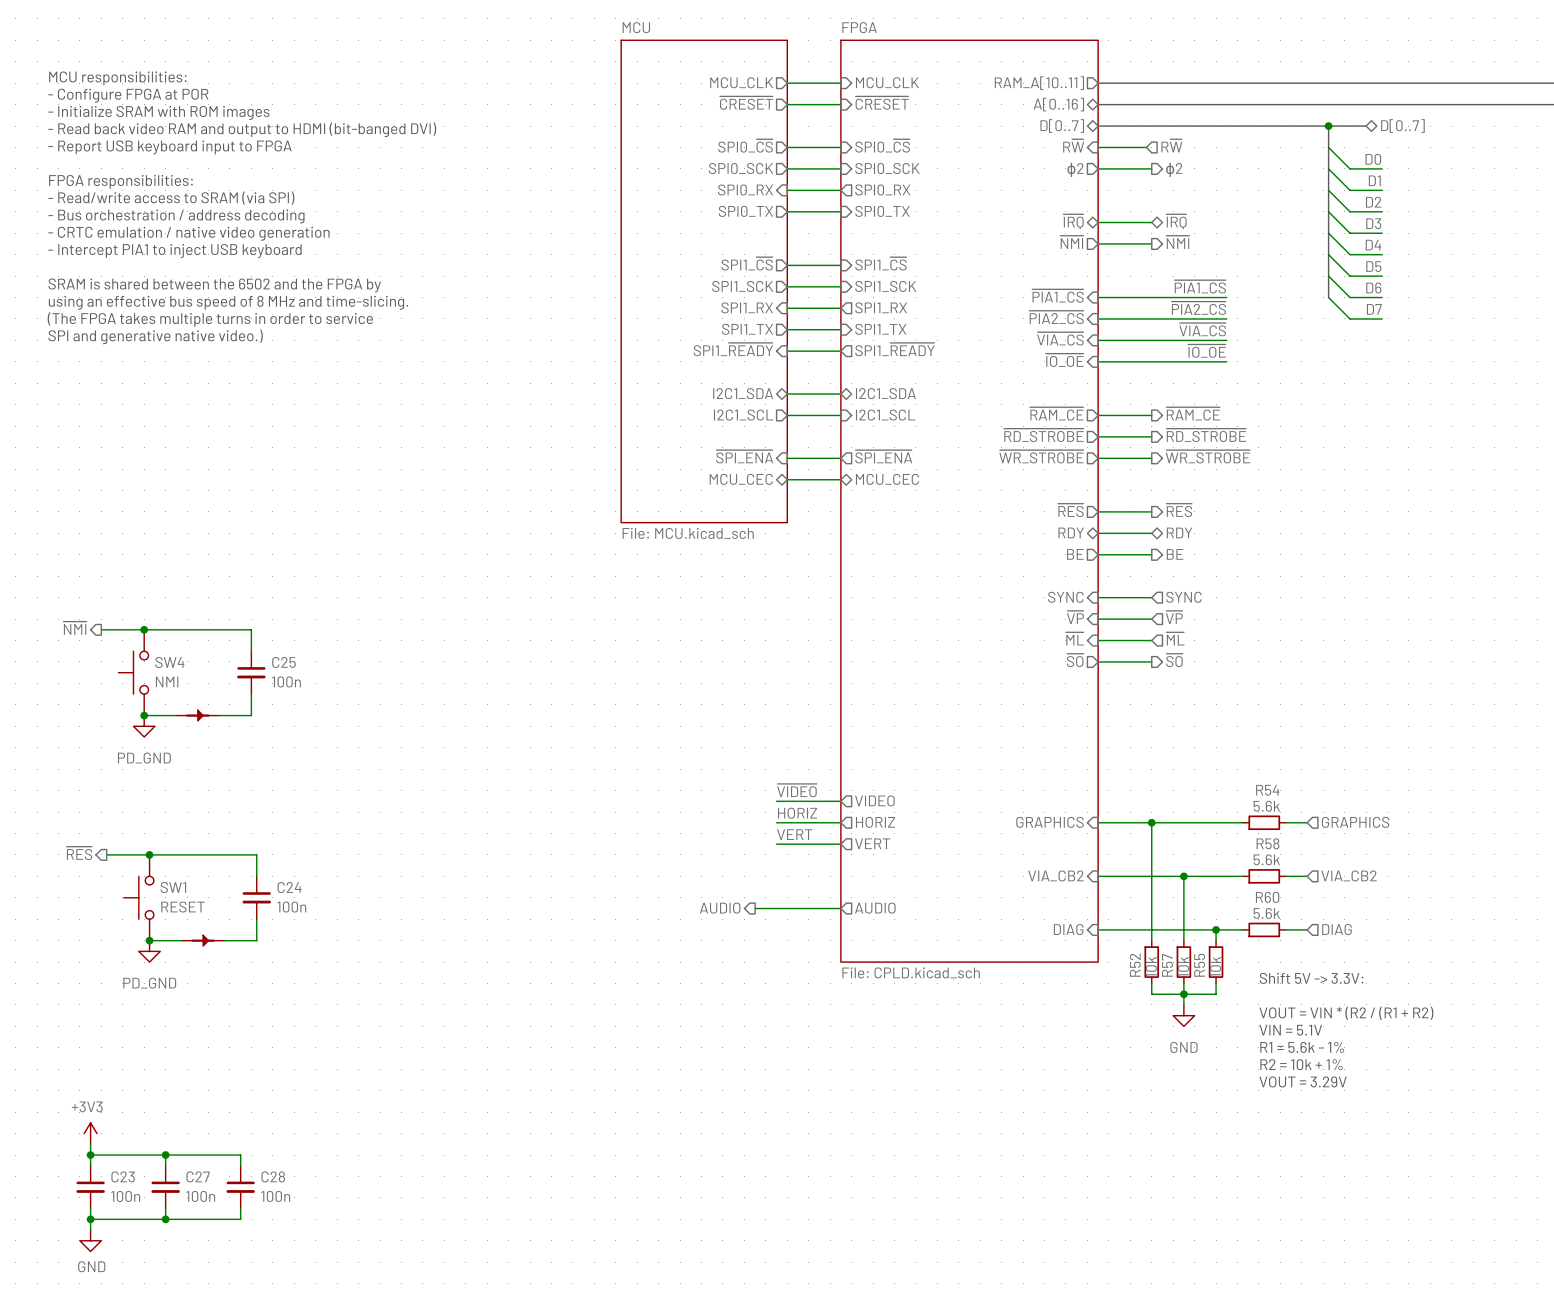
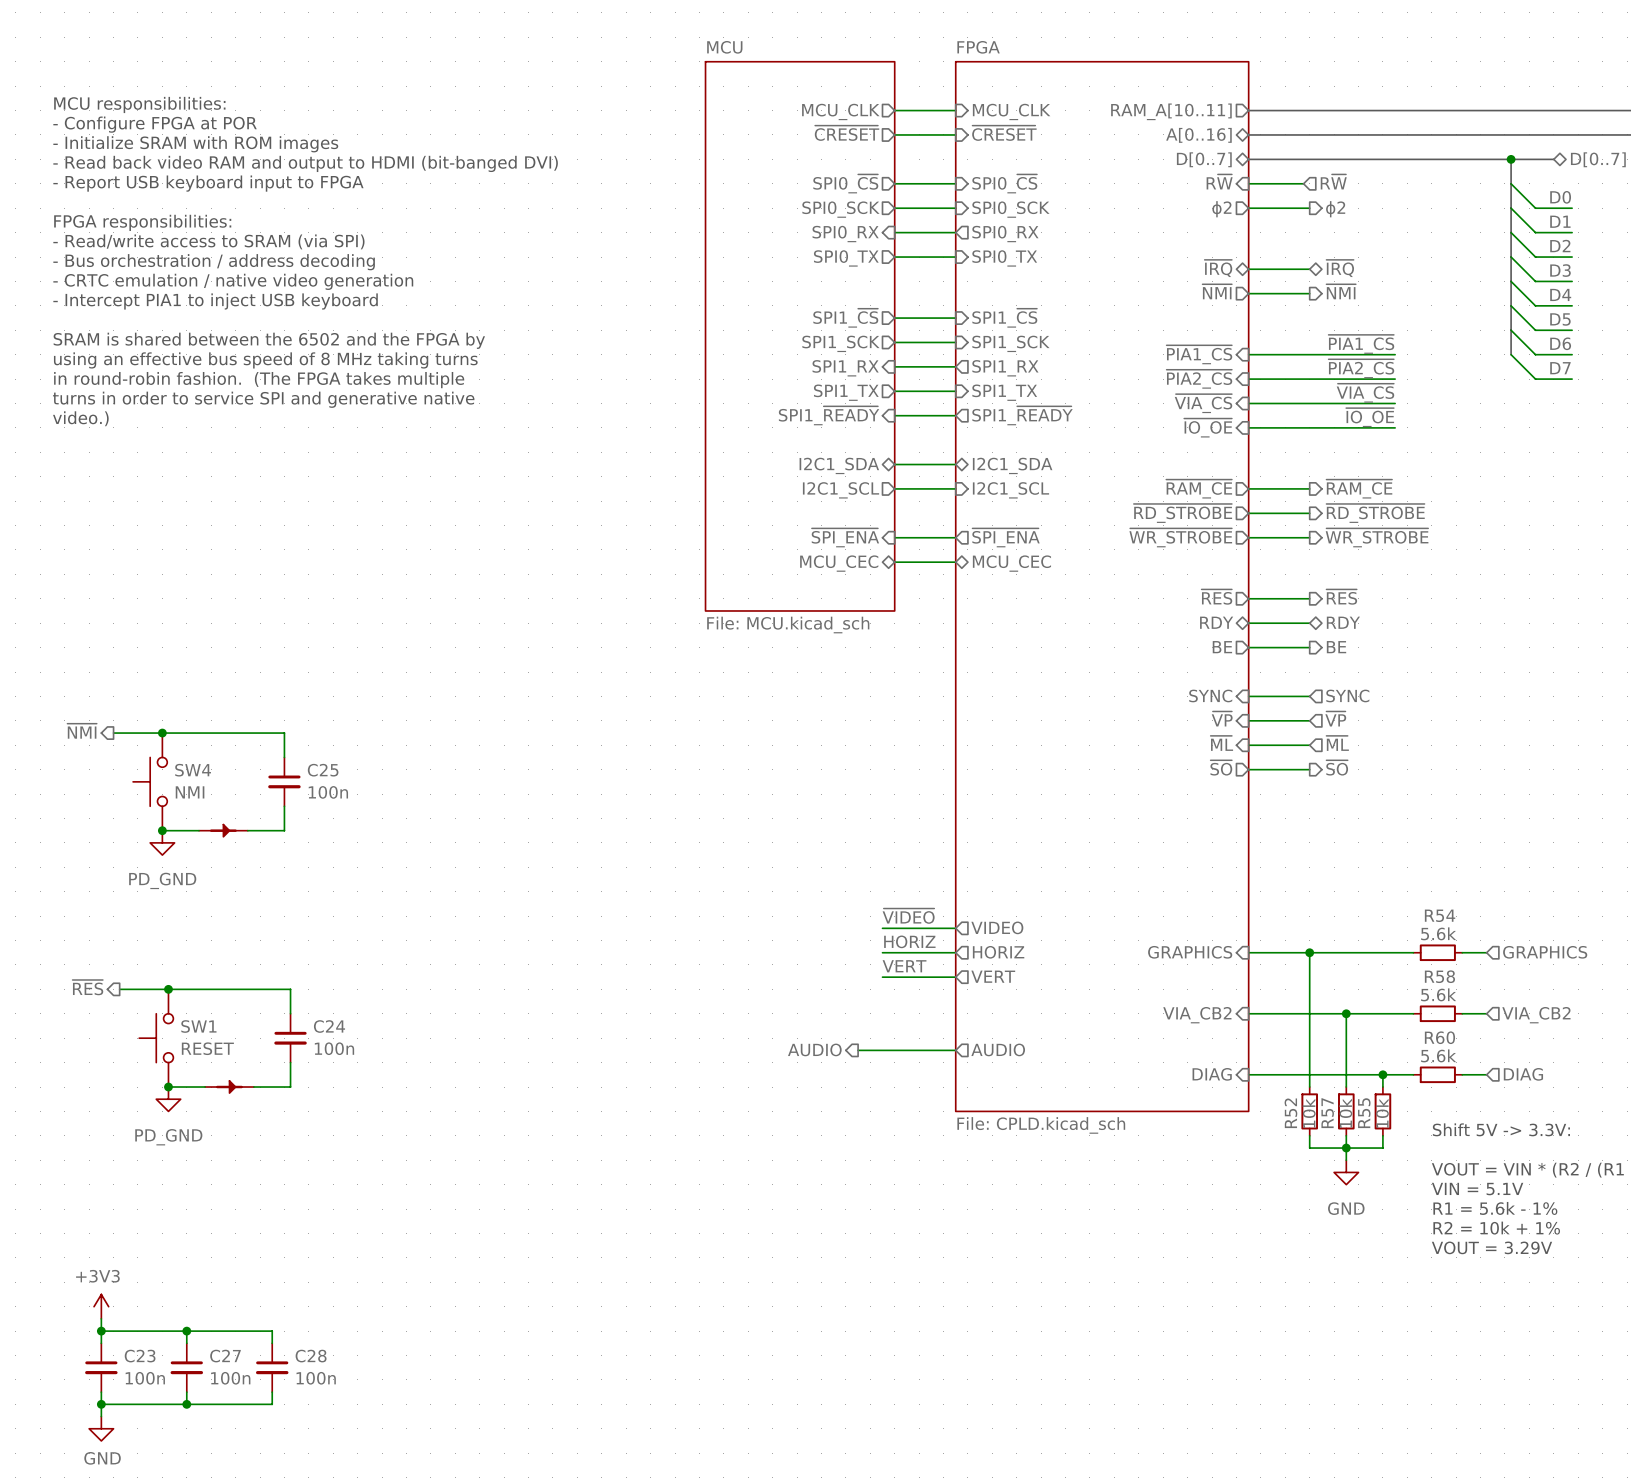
text: using an effective bus speed of 8 MHz and time-slicing. (228, 302) -> using an effective bus speed of 8 MHz taking turns (265, 360)
text: (The FPGA takes multiple turns in order to service (210, 319) -> in round-robin fashion. (The FPGA takes multiple (259, 380)
text: SPI and generative native video.) (155, 336) -> turns in order to service SPI and generative native (263, 399)
text: none -> video.) (80, 418)

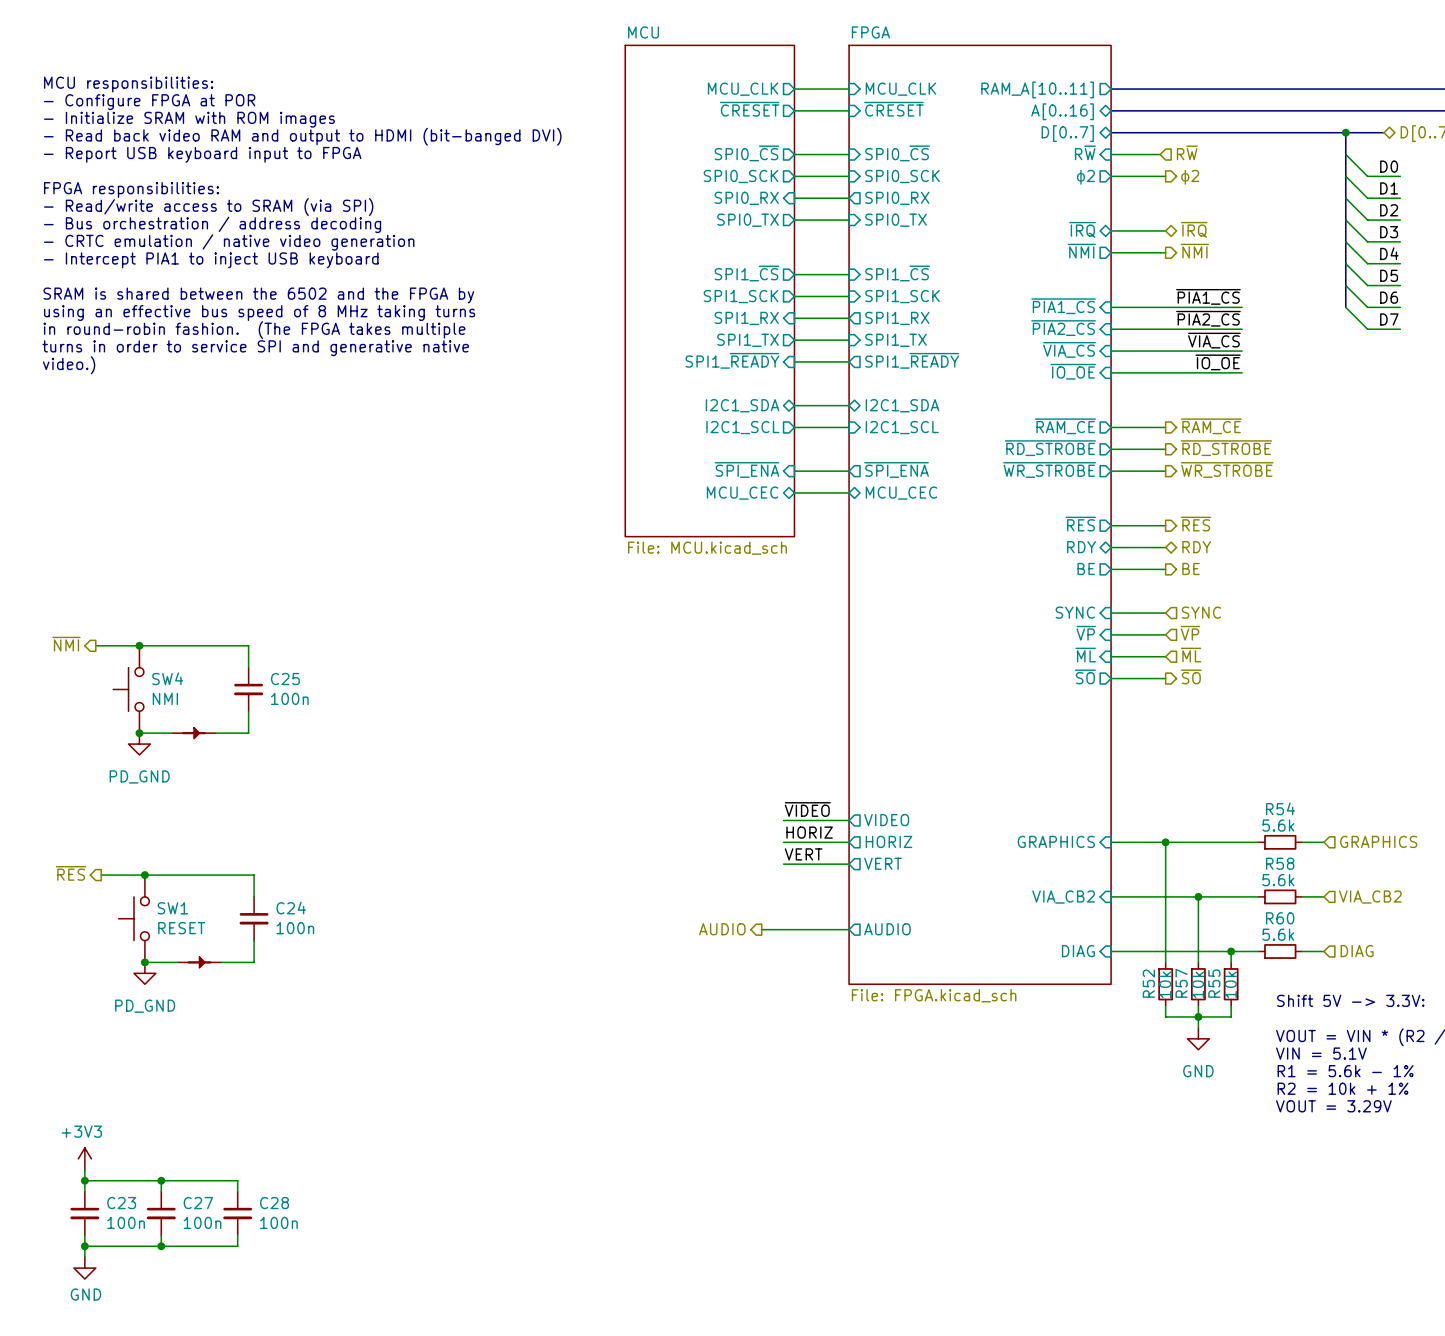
sheet FPGA value: File: CPLD.kicad_sch (1041, 1125) -> File: FPGA.kicad_sch (934, 995)

